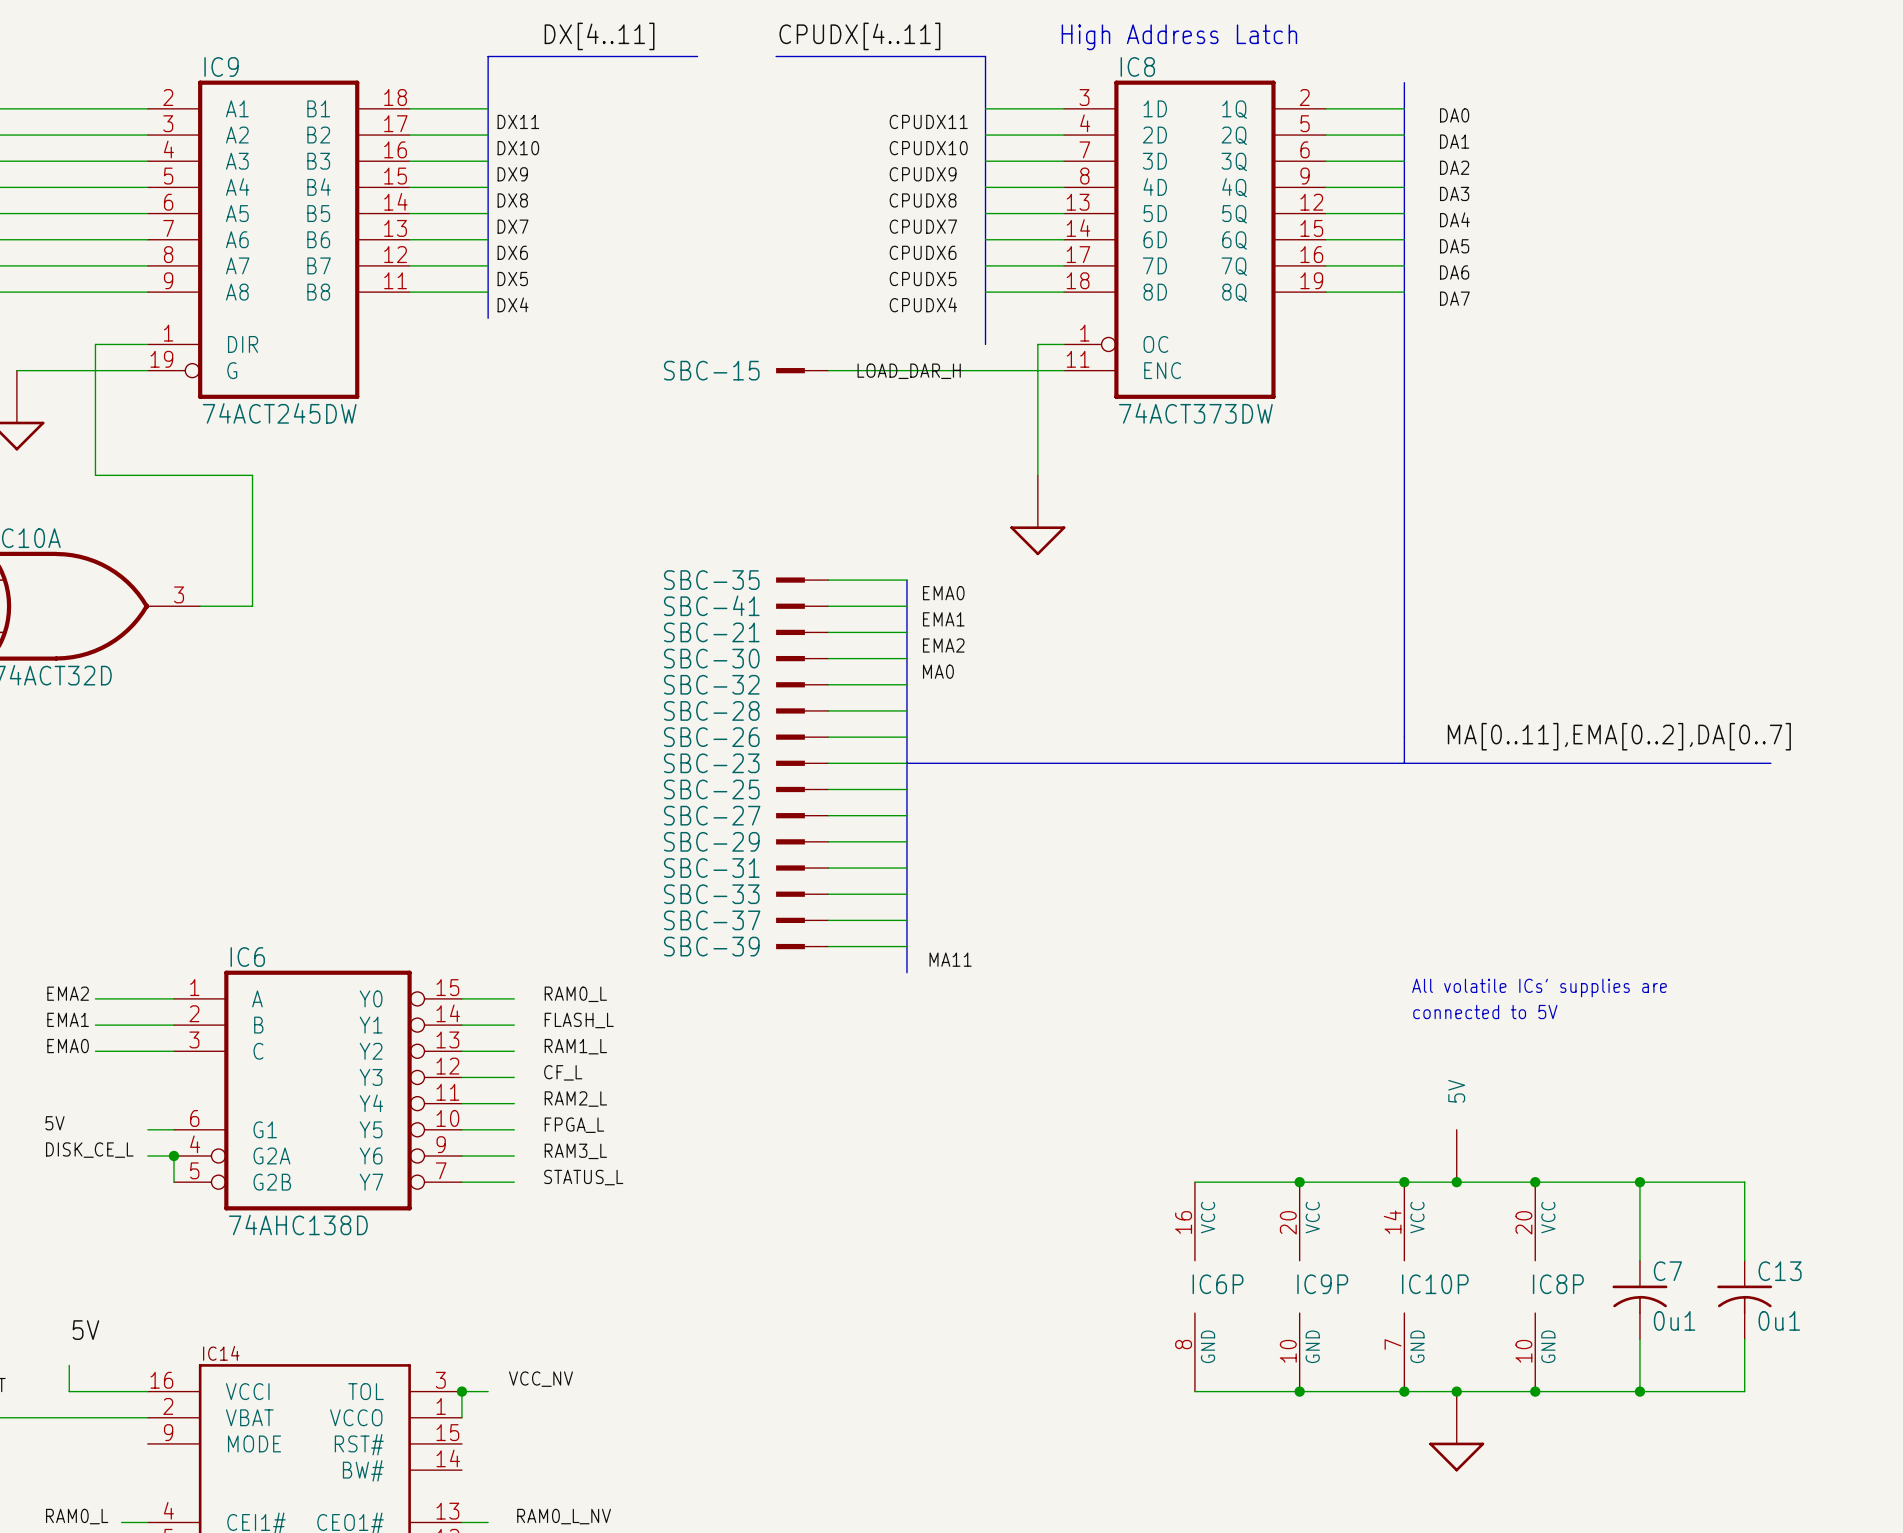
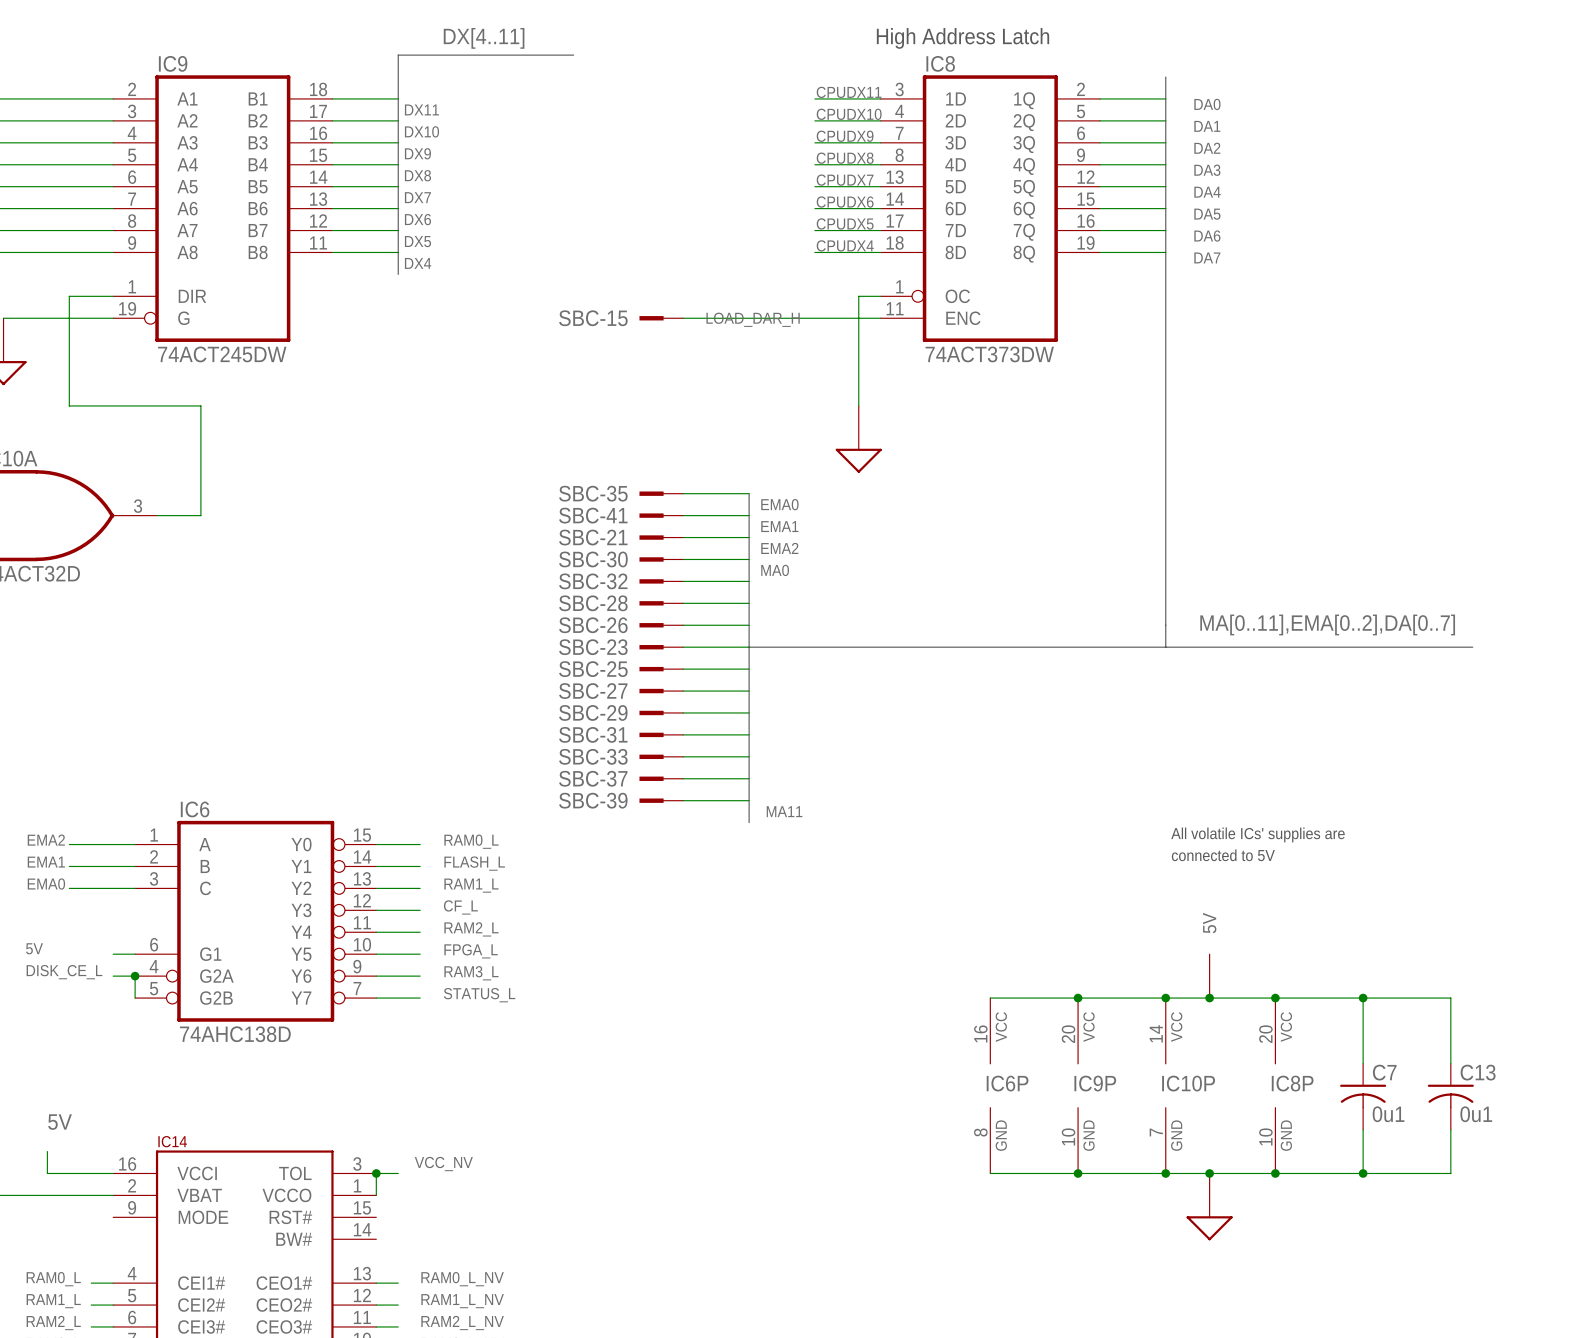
label: CPUDX[4..11] (859, 36) -> none
bus: (776, 56) (985, 56) (985, 344) -> none
label position: CPUDX11 (928, 121) -> CPUDX11 (849, 92)
label position: CPUDX10 (928, 148) -> CPUDX10 (849, 114)
label position: CPUDX9 (923, 174) -> CPUDX9 (845, 136)
label position: CPUDX8 (923, 200) -> CPUDX8 (845, 158)
label position: CPUDX7 (923, 226) -> CPUDX7 (845, 180)
label position: CPUDX6 (923, 252) -> CPUDX6 (845, 202)
label position: CPUDX5 (923, 279) -> CPUDX5 (845, 223)
label position: CPUDX4 (923, 304) -> CPUDX4 (845, 245)

